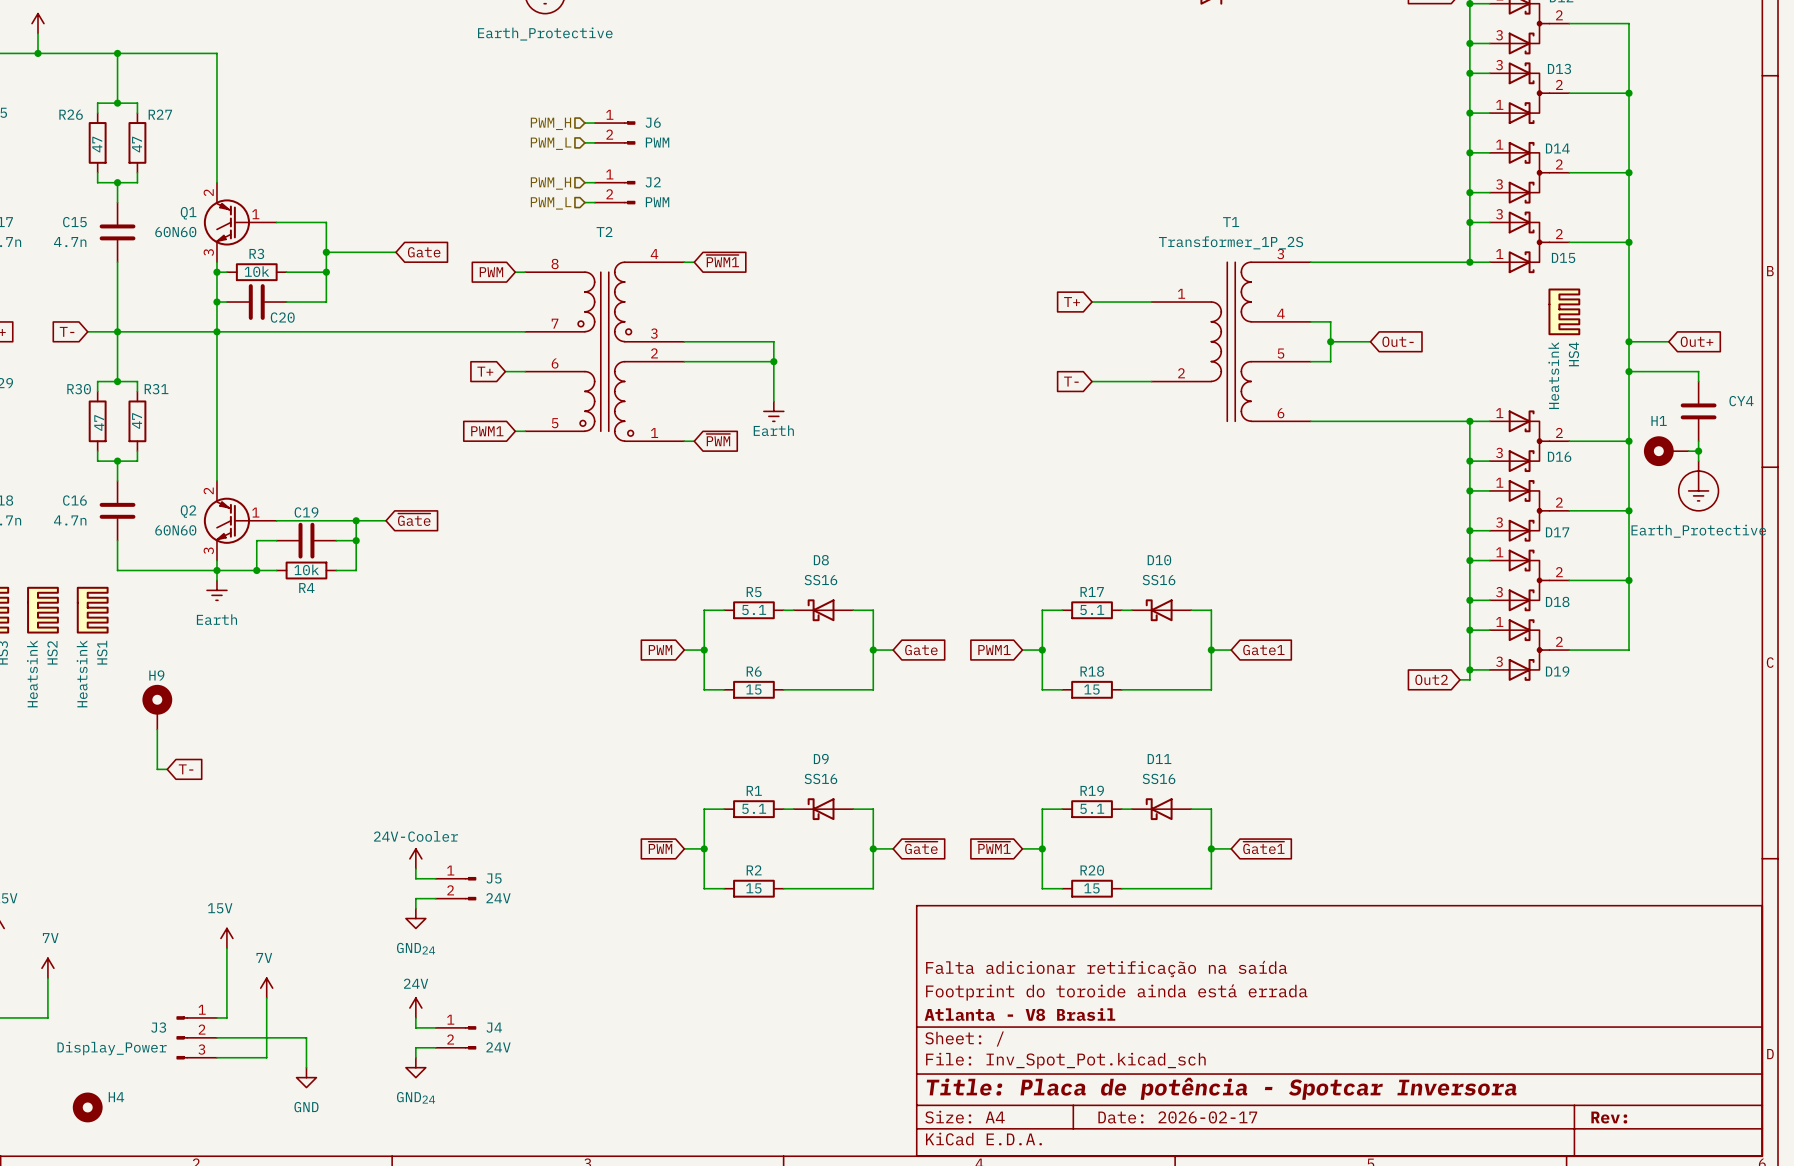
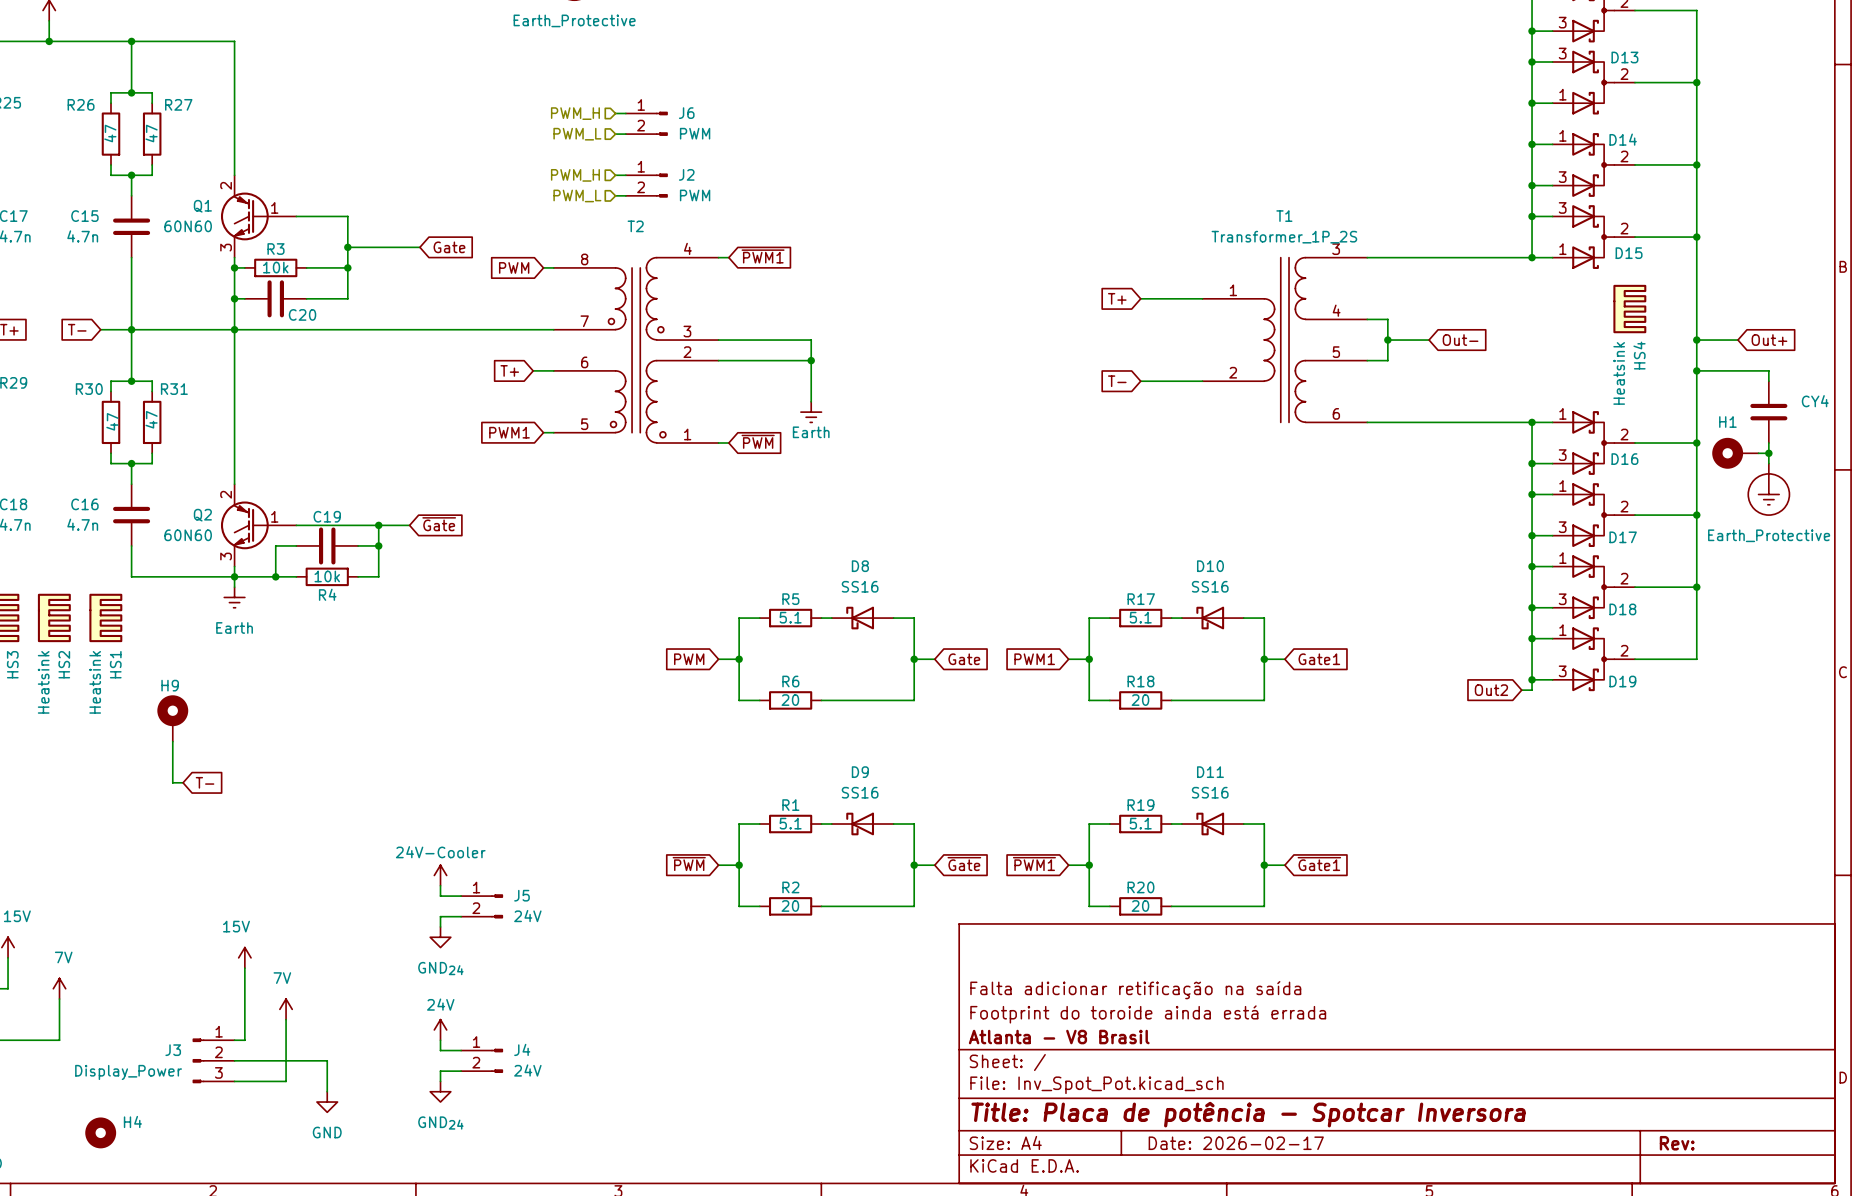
R6 value: 15 (753, 689) -> 20 (790, 700)
R18 value: 15 (1091, 689) -> 20 (1140, 700)
R2 value: 15 (753, 888) -> 20 (790, 905)
R20 value: 15 (1091, 888) -> 20 (1140, 905)

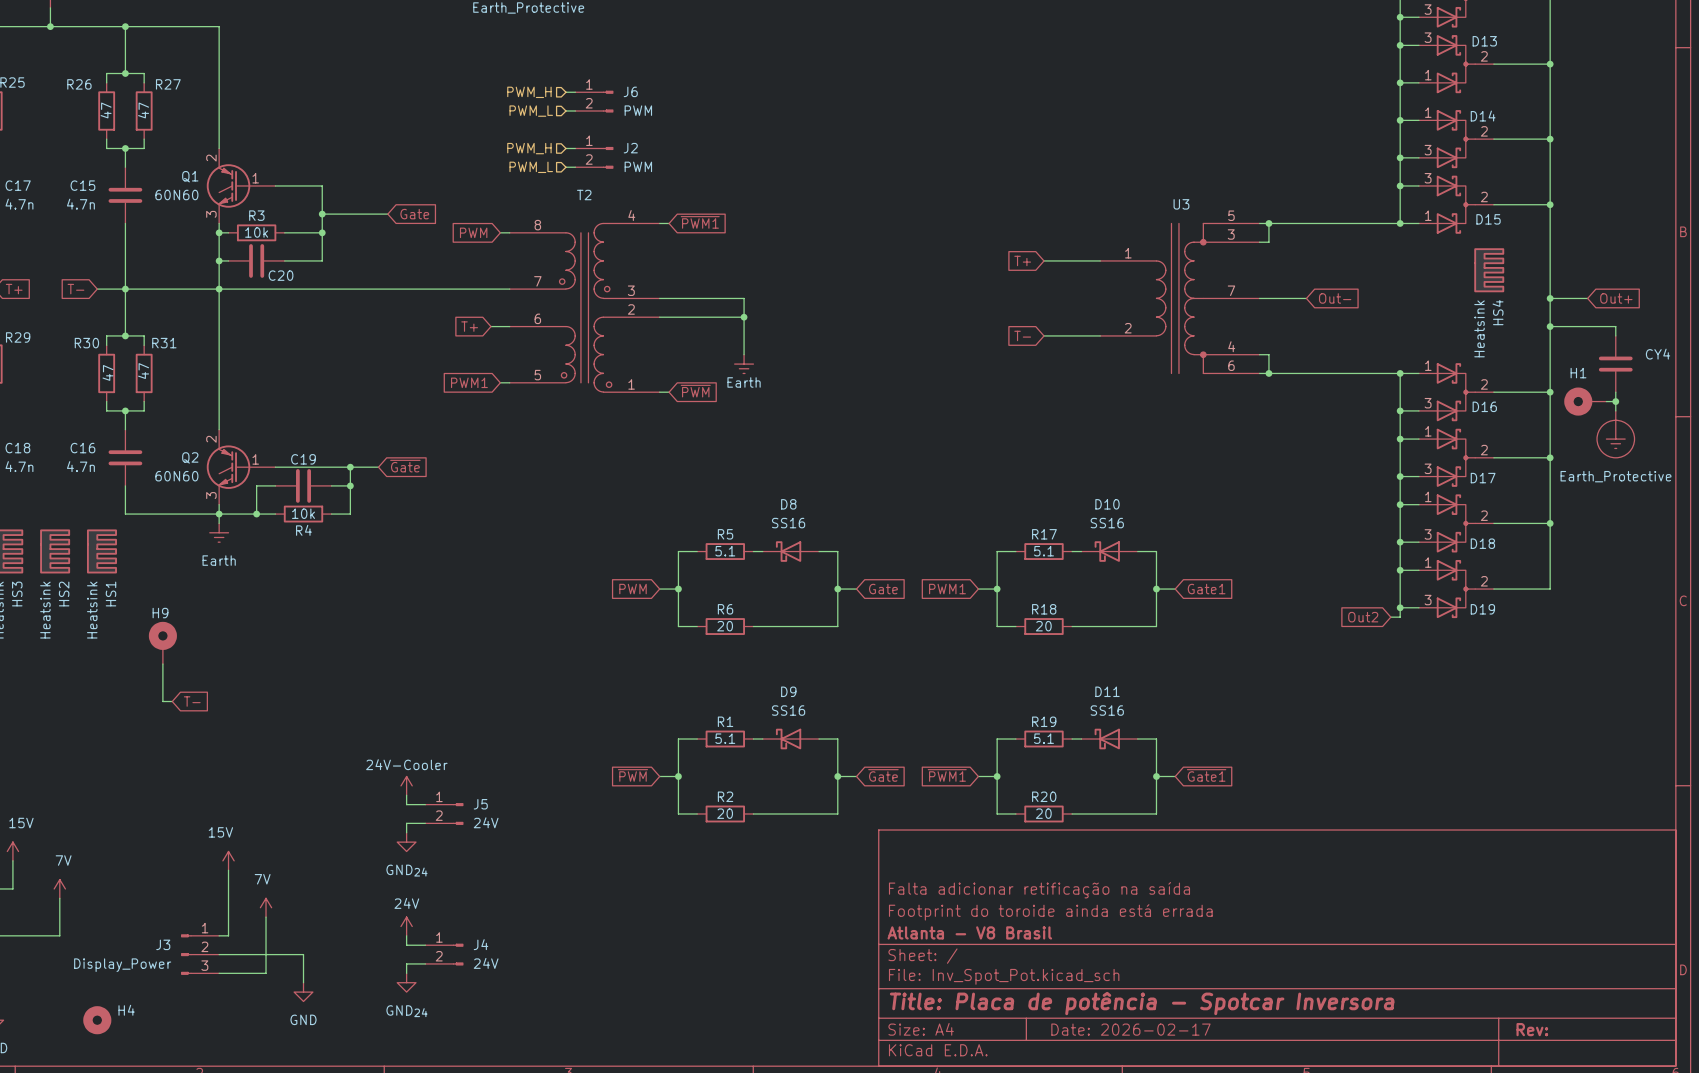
wire: none -> (1268, 223) (1268, 242) (1259, 242)
junction: none -> (1268, 223)
wire: (1367, 319) (1387, 319) (1387, 360) (1367, 360) -> none
T1: Transformer_1P_2S (1284, 340) -> none
U3: none -> (1179, 298)
junction: (1387, 340) -> none
wire: none -> (1259, 354) (1268, 354) (1268, 373)
junction: none -> (1268, 373)

